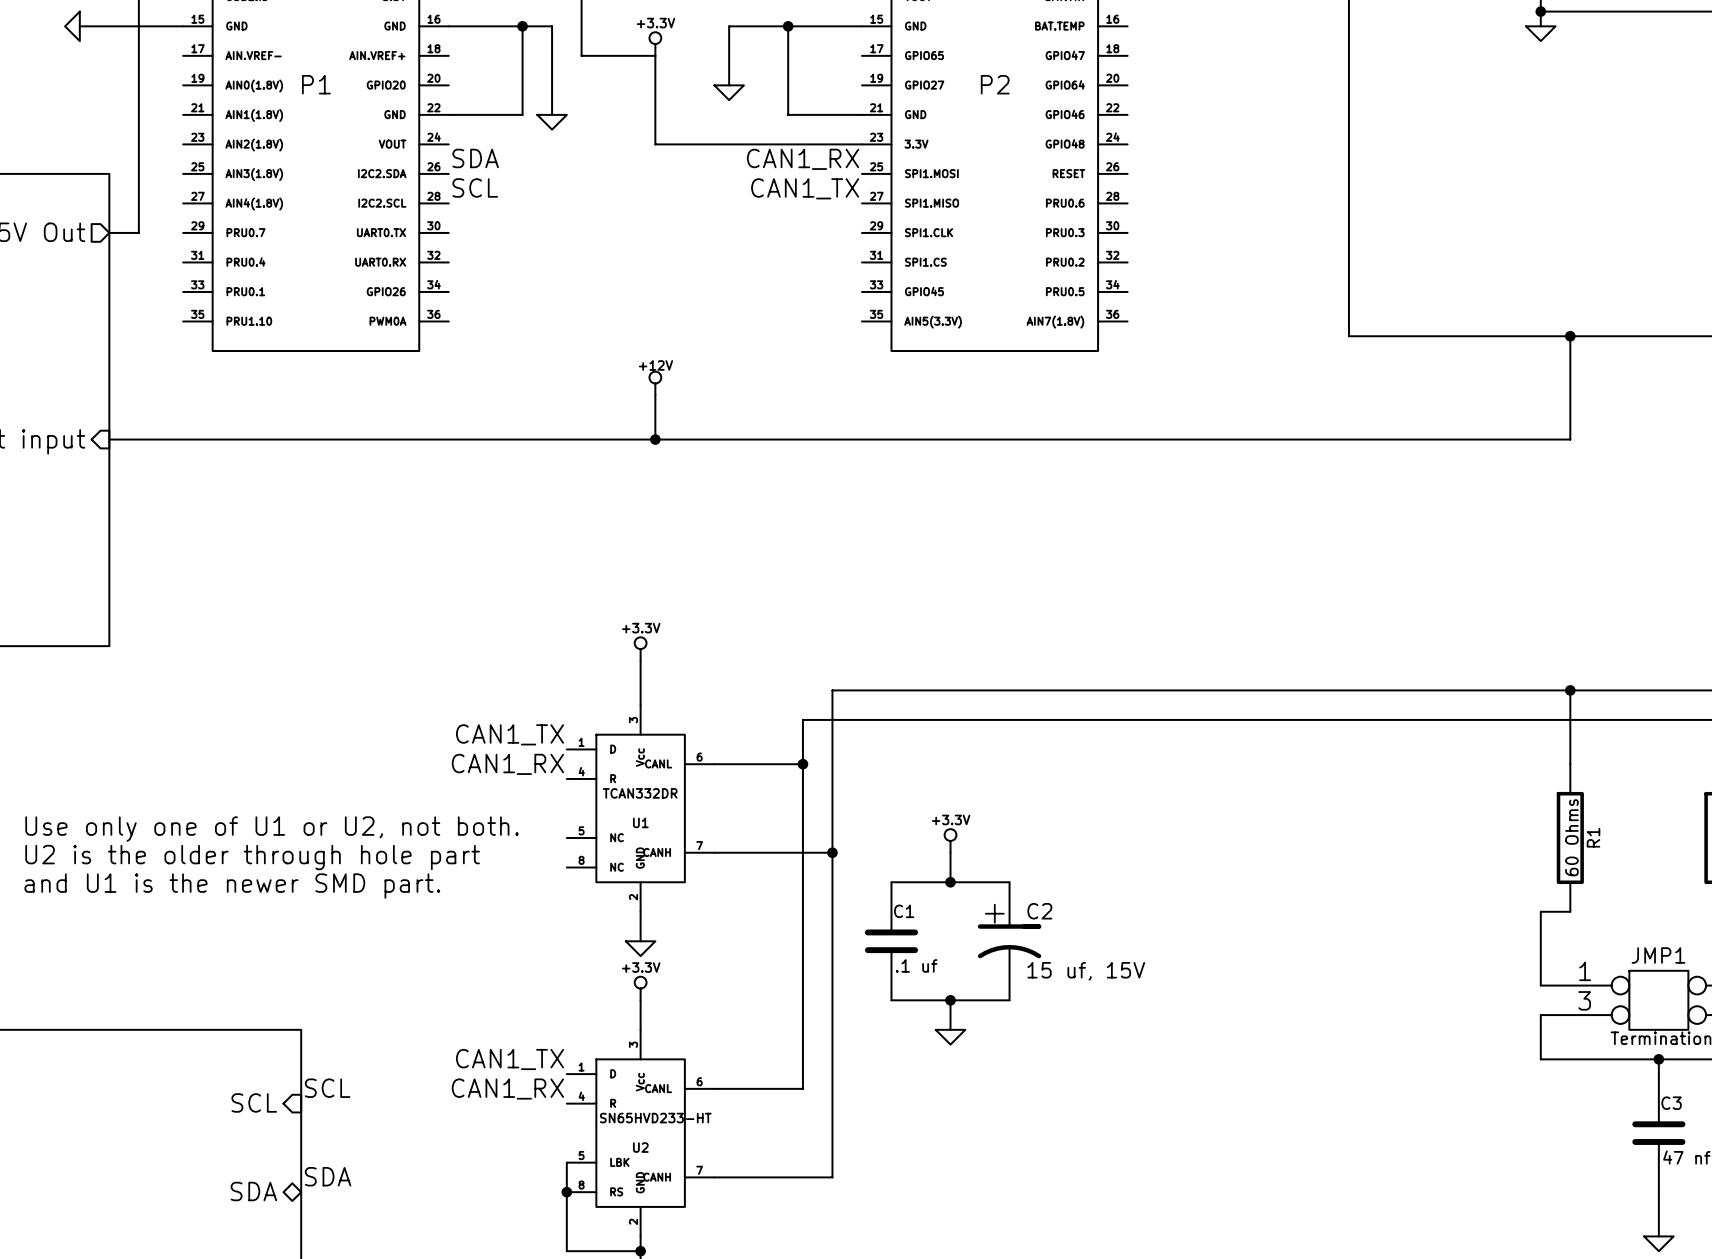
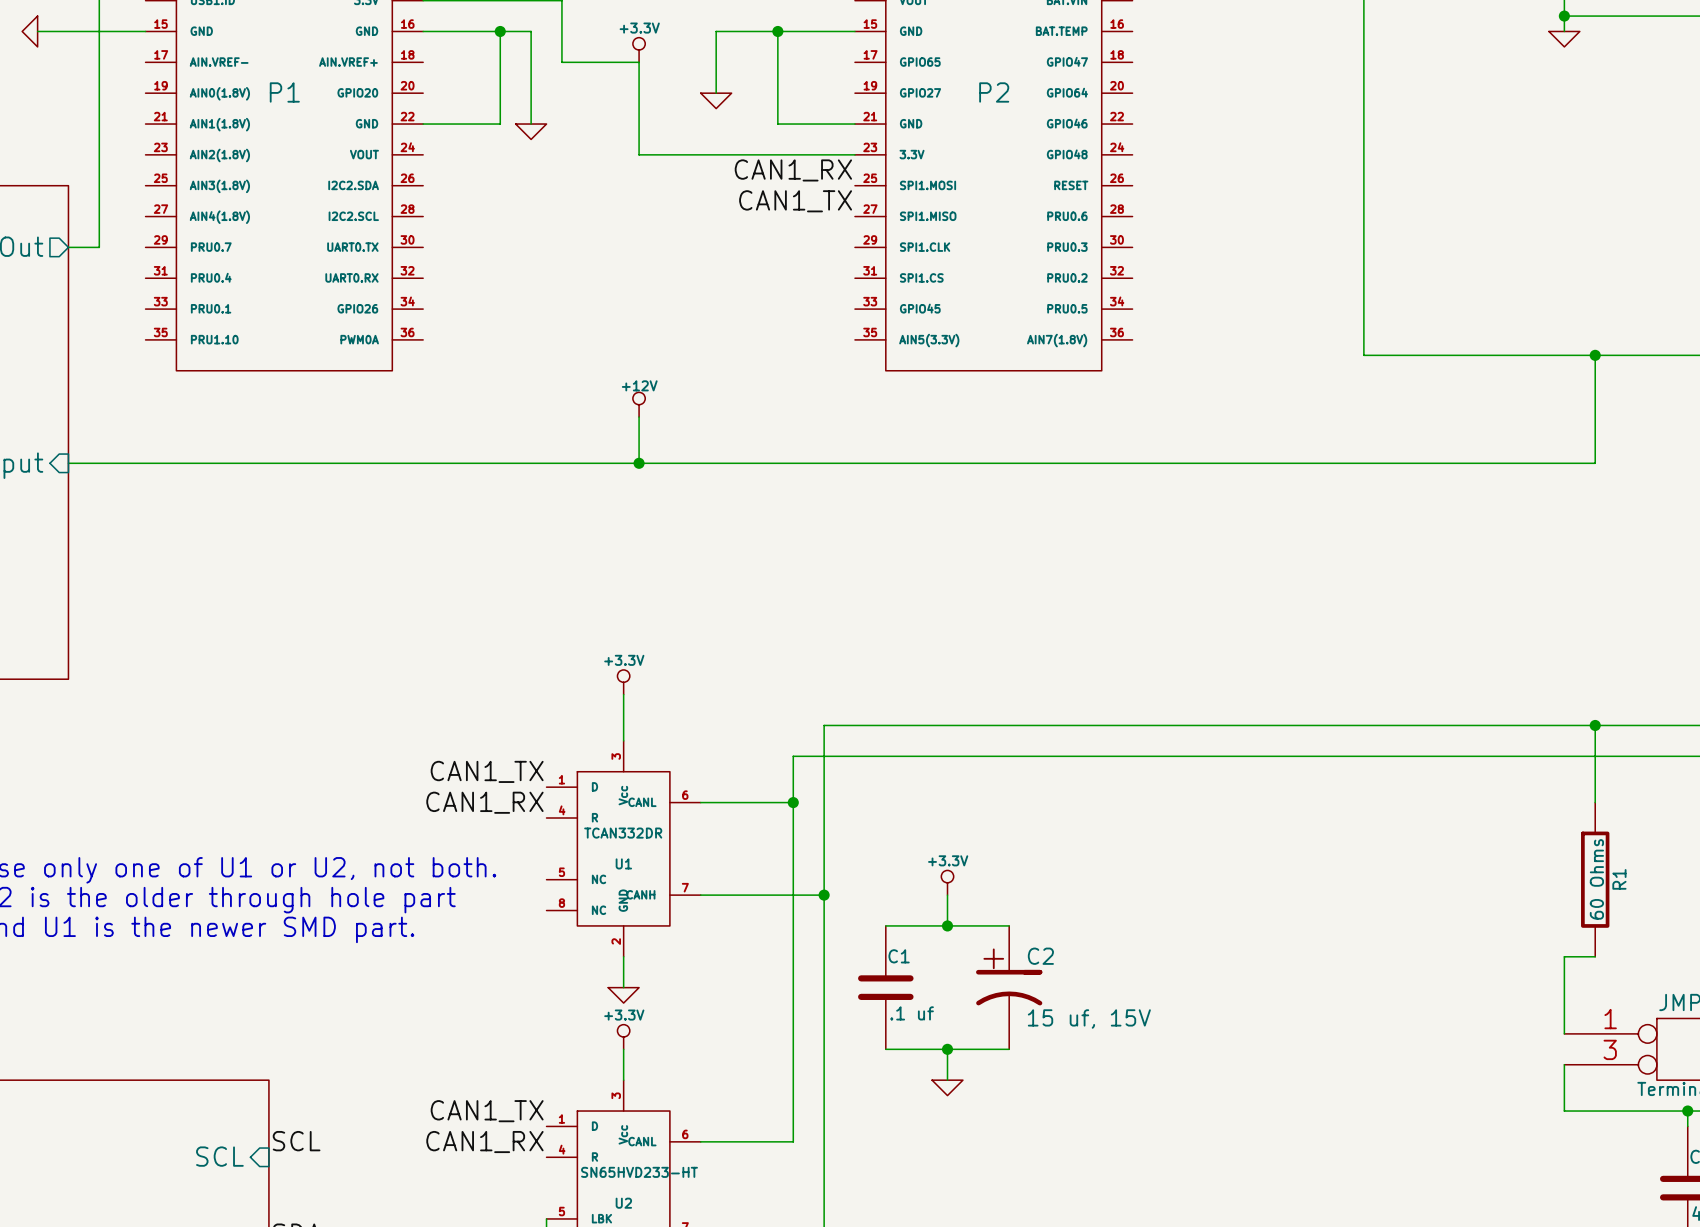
label: SDA (475, 158) -> none
label: SCL (475, 187) -> none

